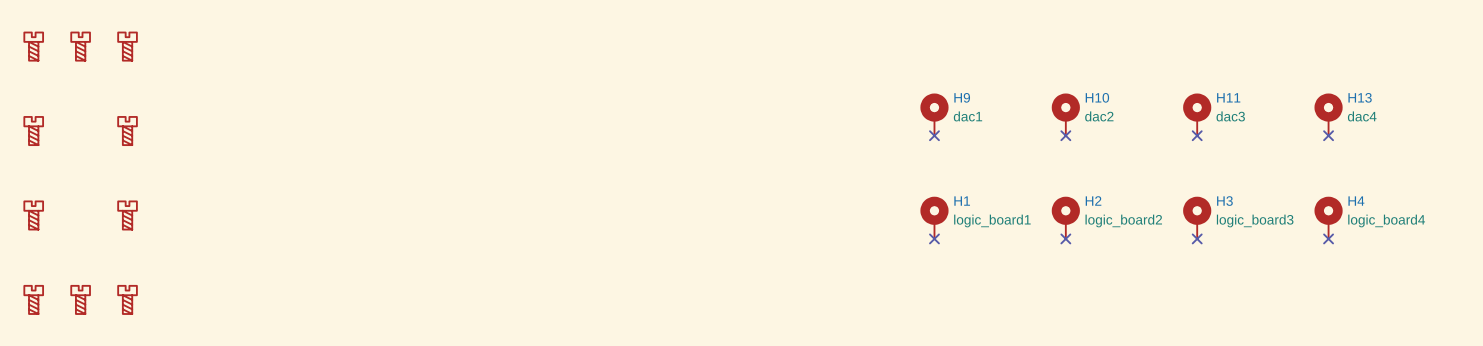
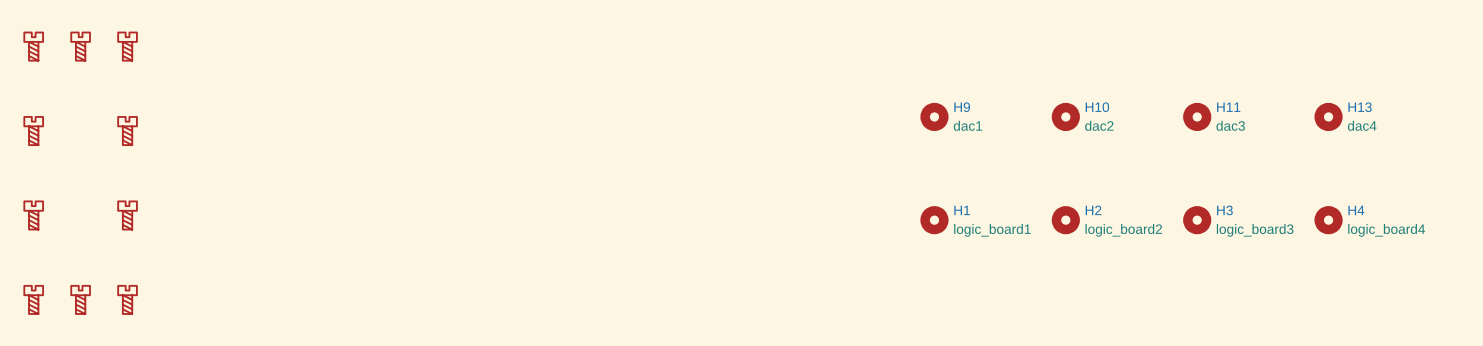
H9 symbol: [920, 93, 949, 136] -> [920, 102, 949, 132]
H10 symbol: [1051, 93, 1080, 136] -> [1051, 102, 1080, 132]
H11 symbol: [1183, 93, 1212, 136] -> [1183, 102, 1212, 132]
H13 symbol: [1314, 93, 1343, 136] -> [1314, 102, 1343, 132]
no-connect mark: (934, 135) -> none
no-connect mark: (1065, 135) -> none
no-connect mark: (1197, 135) -> none
no-connect mark: (1328, 135) -> none
H1 symbol: [920, 196, 949, 239] -> [920, 206, 949, 235]
H2 symbol: [1051, 196, 1080, 239] -> [1051, 206, 1080, 235]
H3 symbol: [1183, 196, 1212, 239] -> [1183, 206, 1212, 235]
H4 symbol: [1314, 196, 1343, 239] -> [1314, 206, 1343, 235]
no-connect mark: (934, 238) -> none
no-connect mark: (1065, 238) -> none
no-connect mark: (1197, 238) -> none
no-connect mark: (1328, 238) -> none

